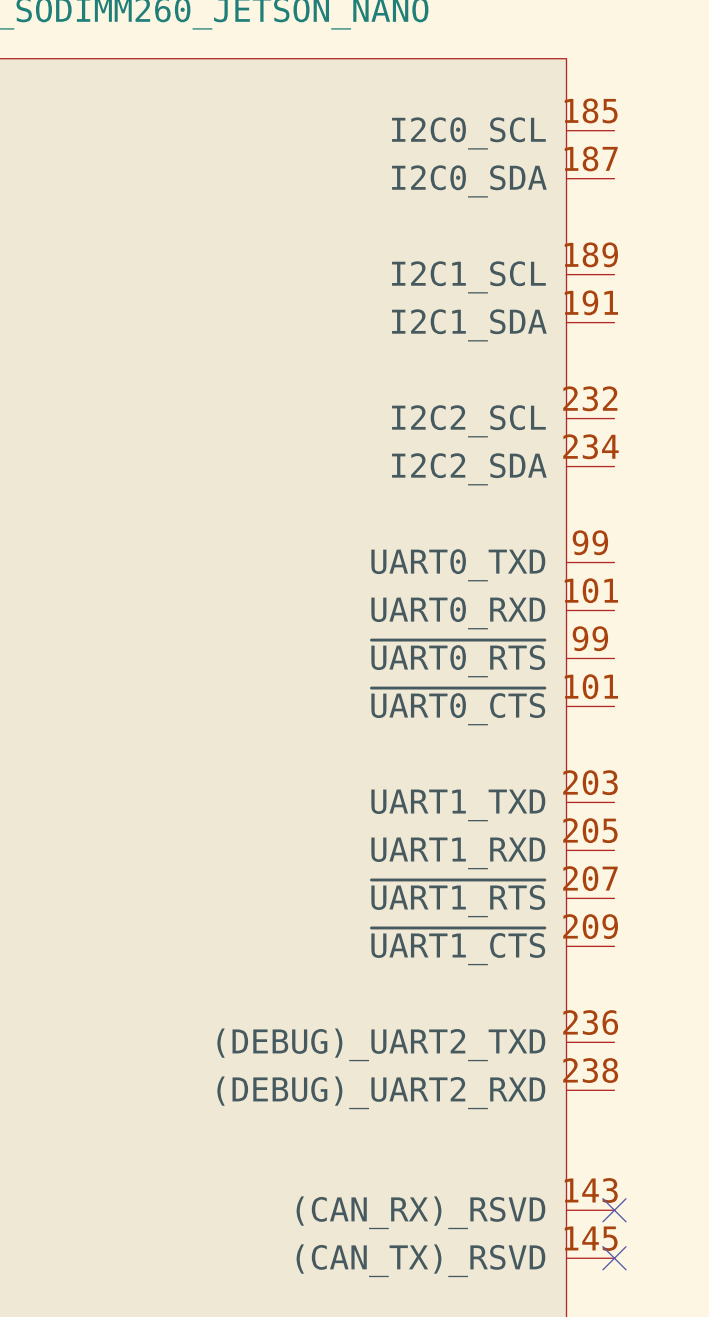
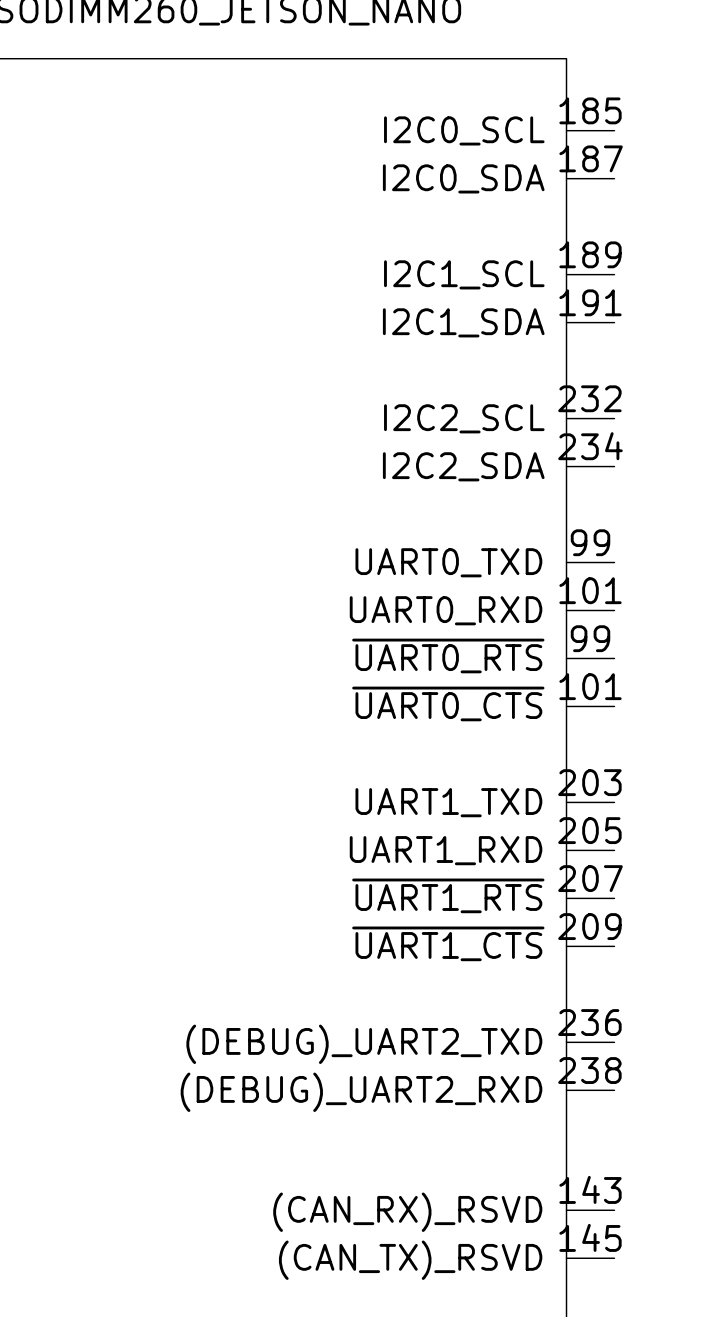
no-connect mark: (614, 1210) -> none
no-connect mark: (614, 1258) -> none

